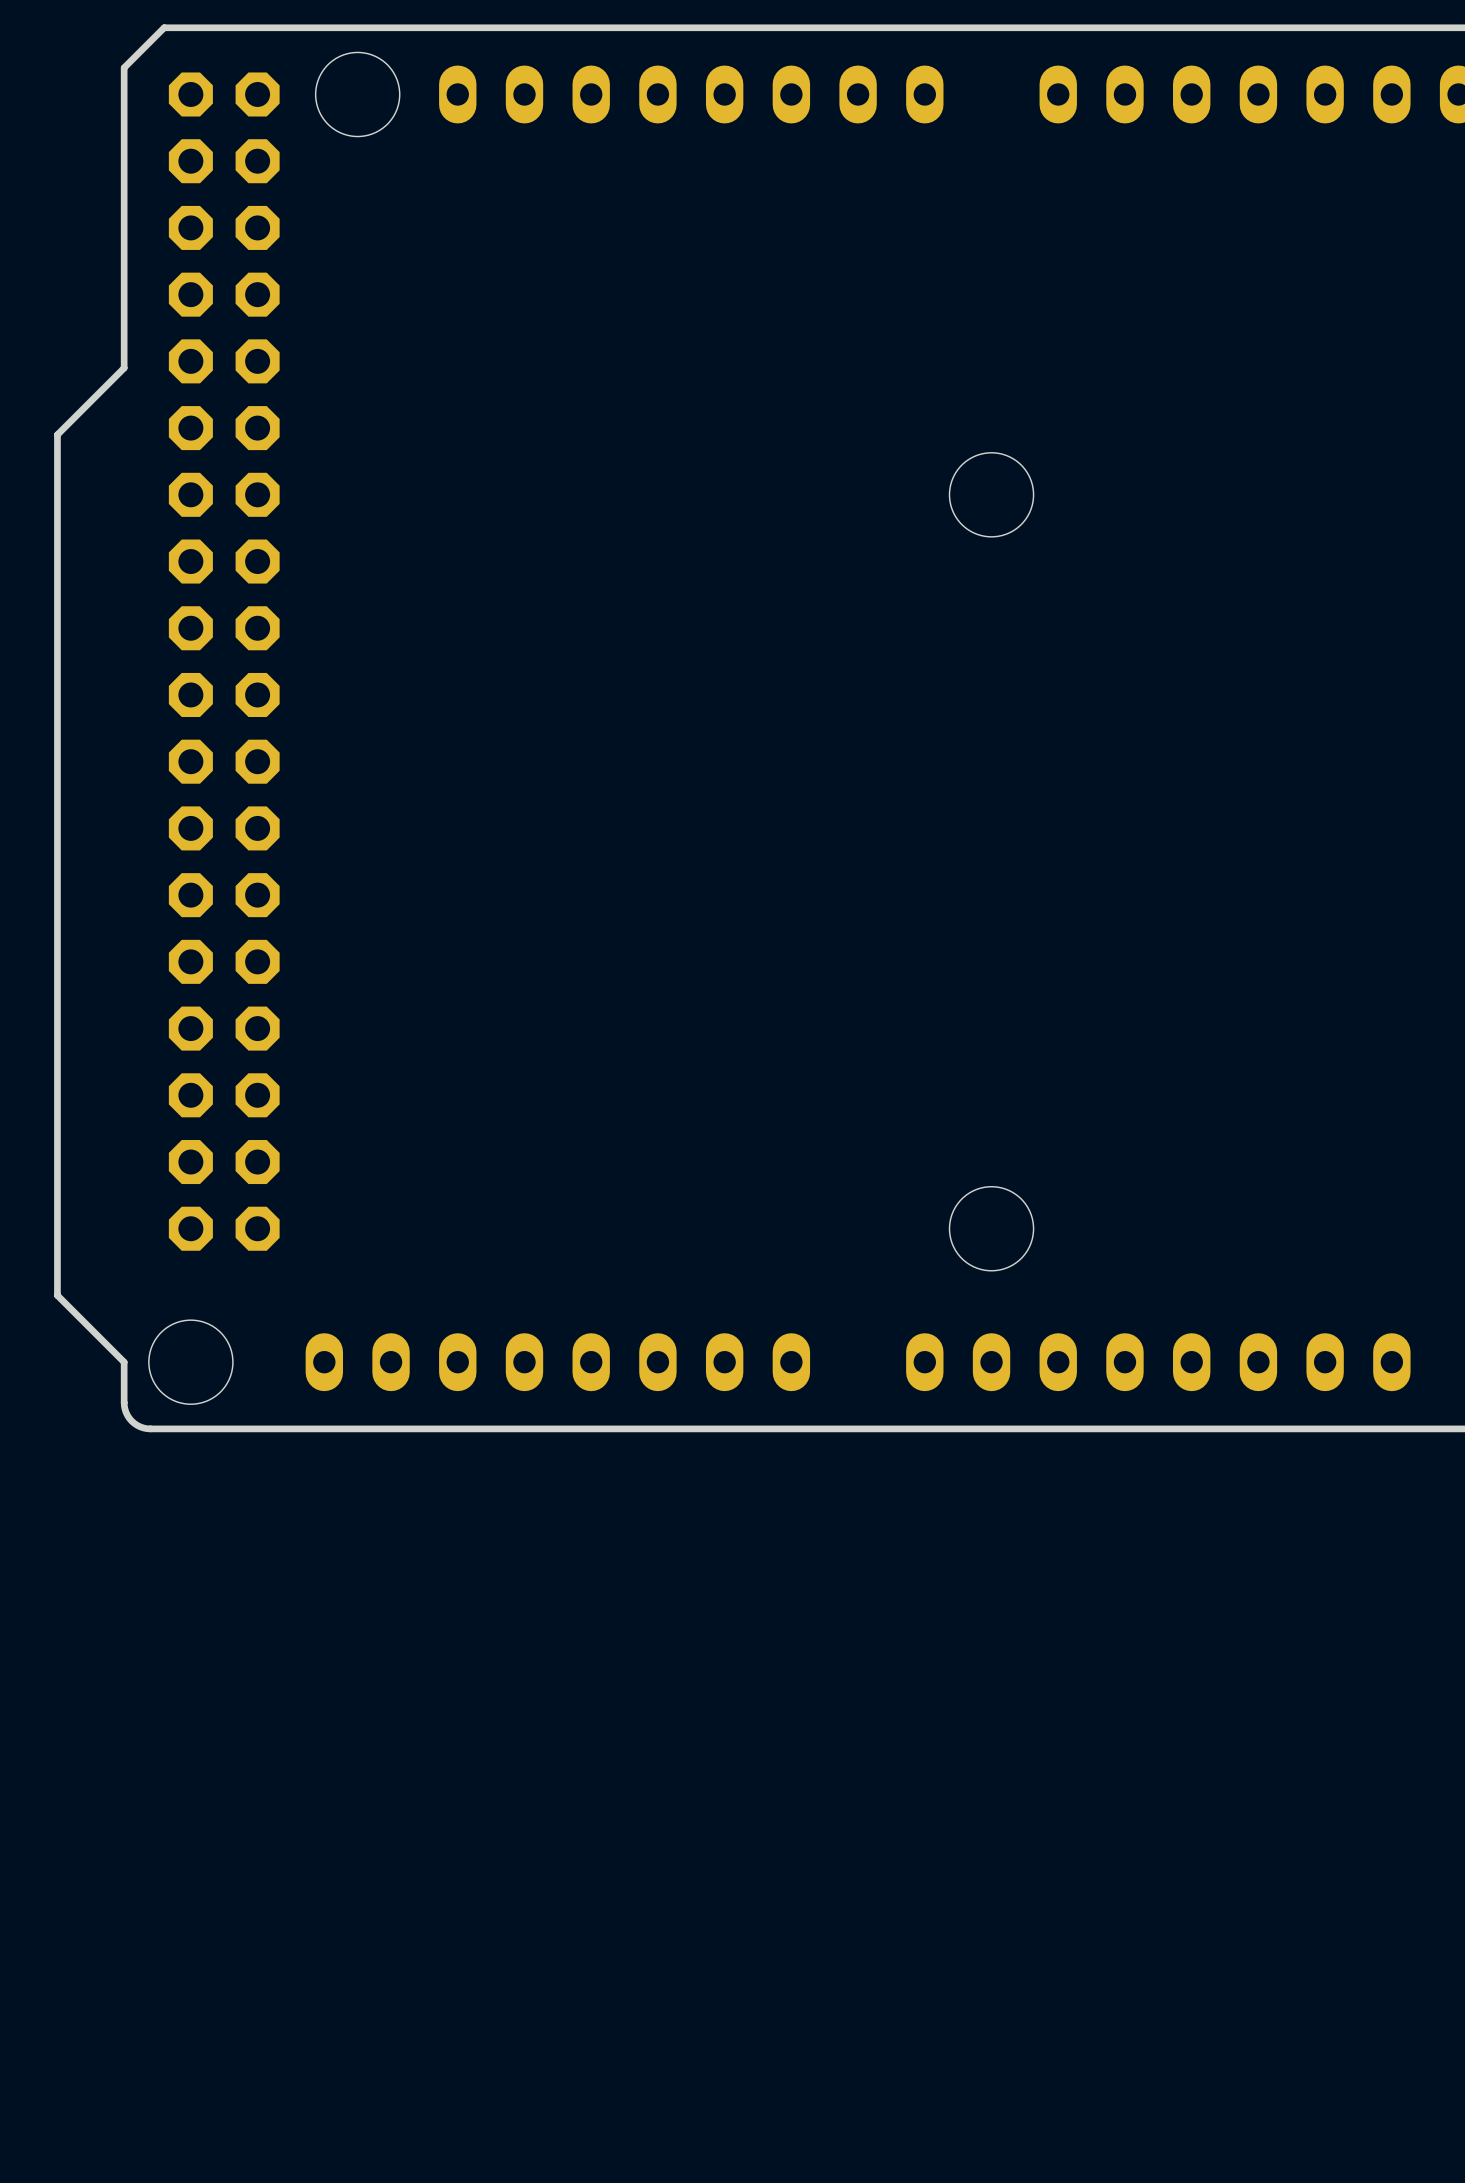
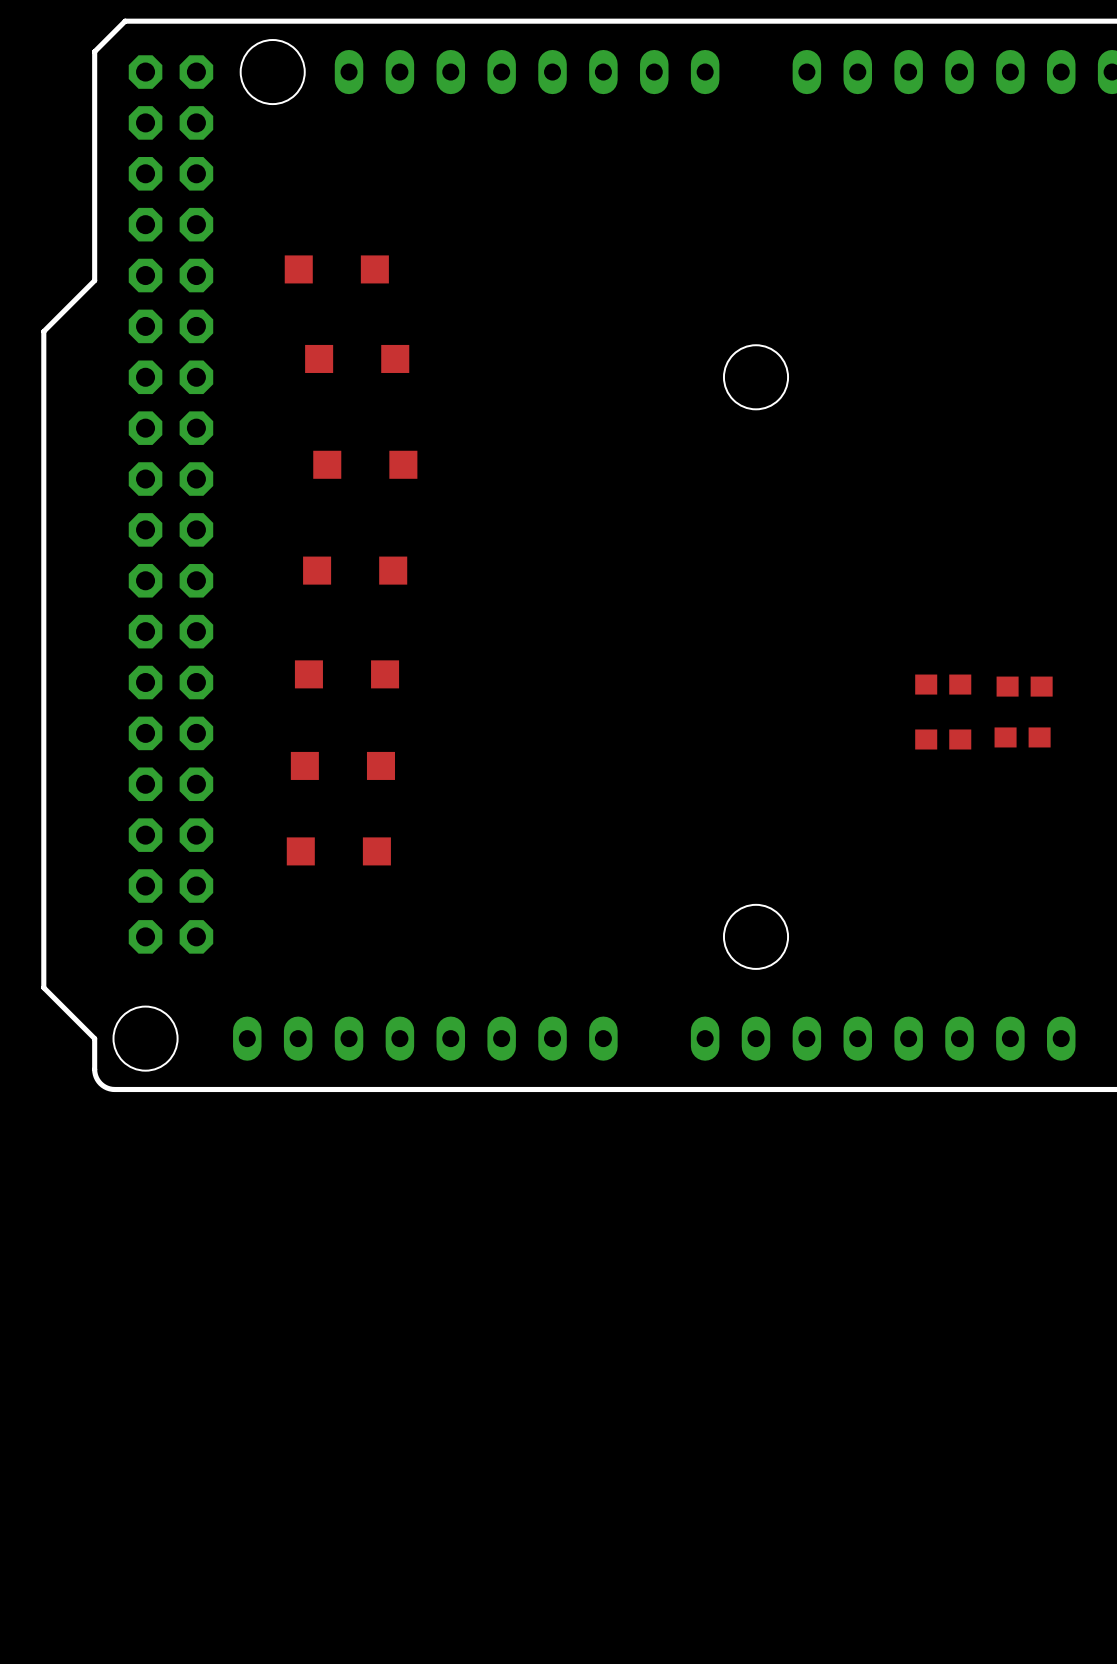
part: none -> (336, 269)
part: none -> (357, 358)
part: none -> (365, 464)
part: none -> (355, 570)
part: none -> (347, 674)
part: none -> (943, 684)
part: none -> (1024, 686)
part: none -> (1022, 737)
part: none -> (943, 739)
part: none -> (342, 765)
part: none -> (338, 851)

